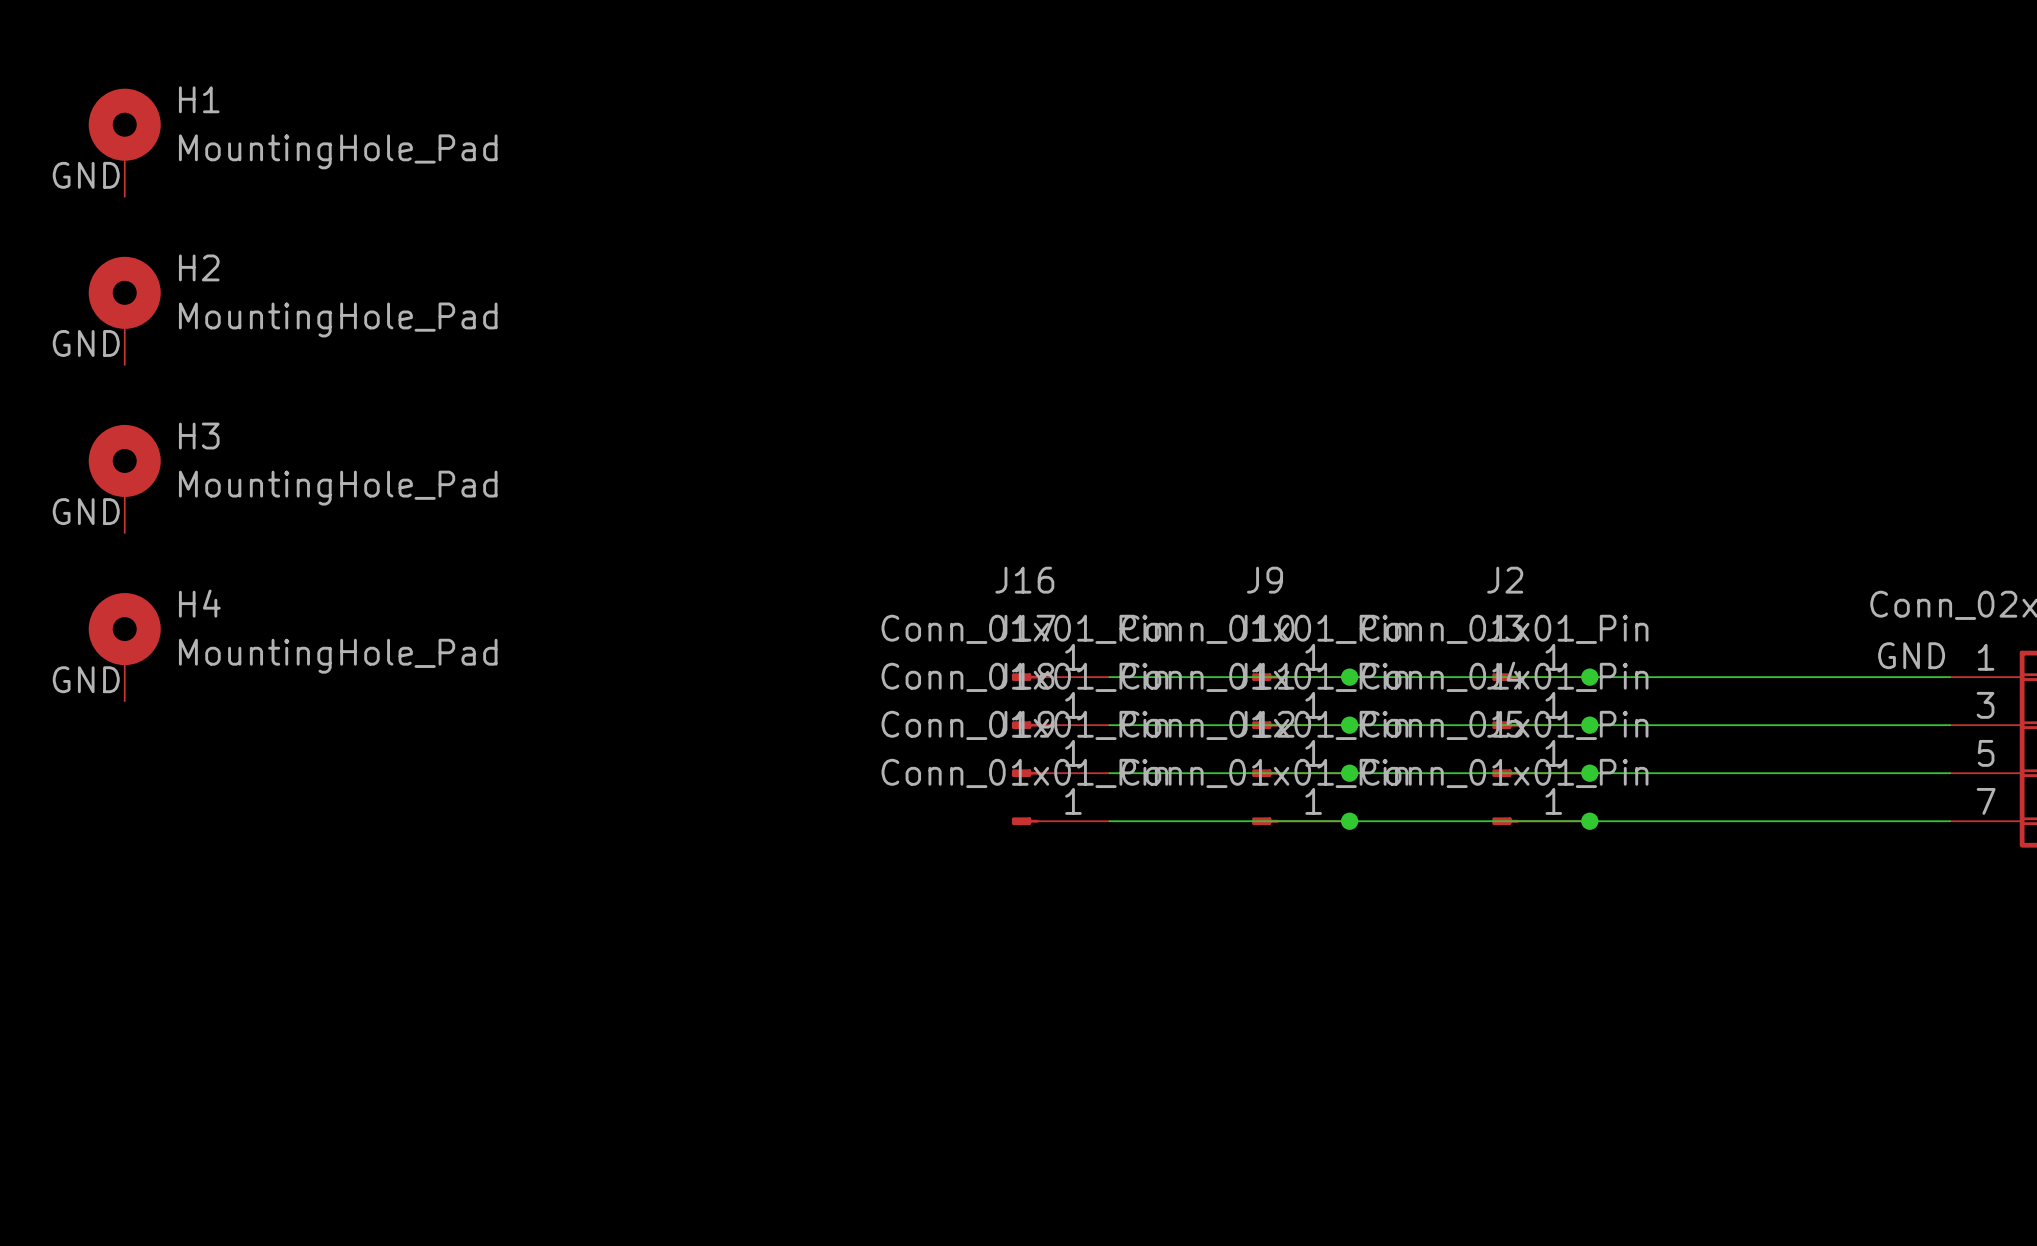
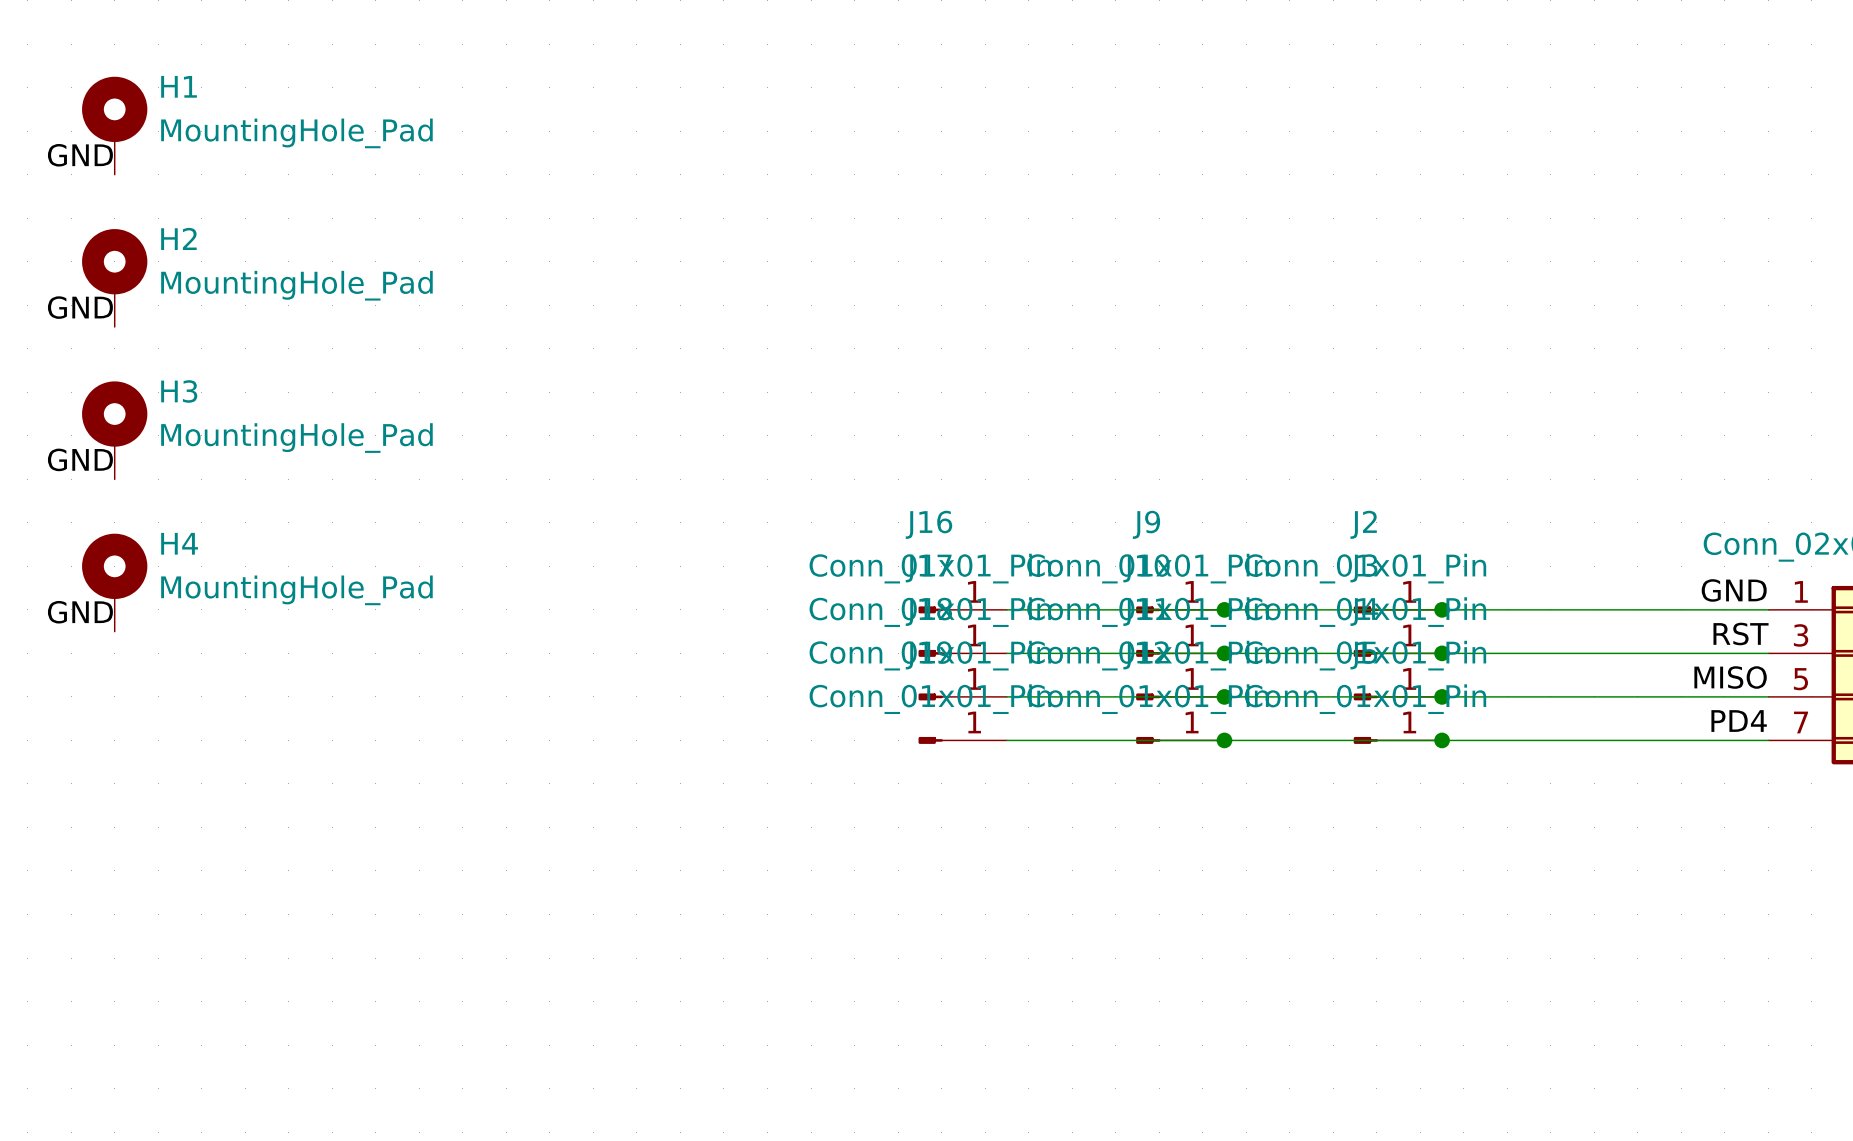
label: none -> RST (1741, 633)
label: none -> MISO (1730, 677)
label: none -> PD4 (1739, 721)

